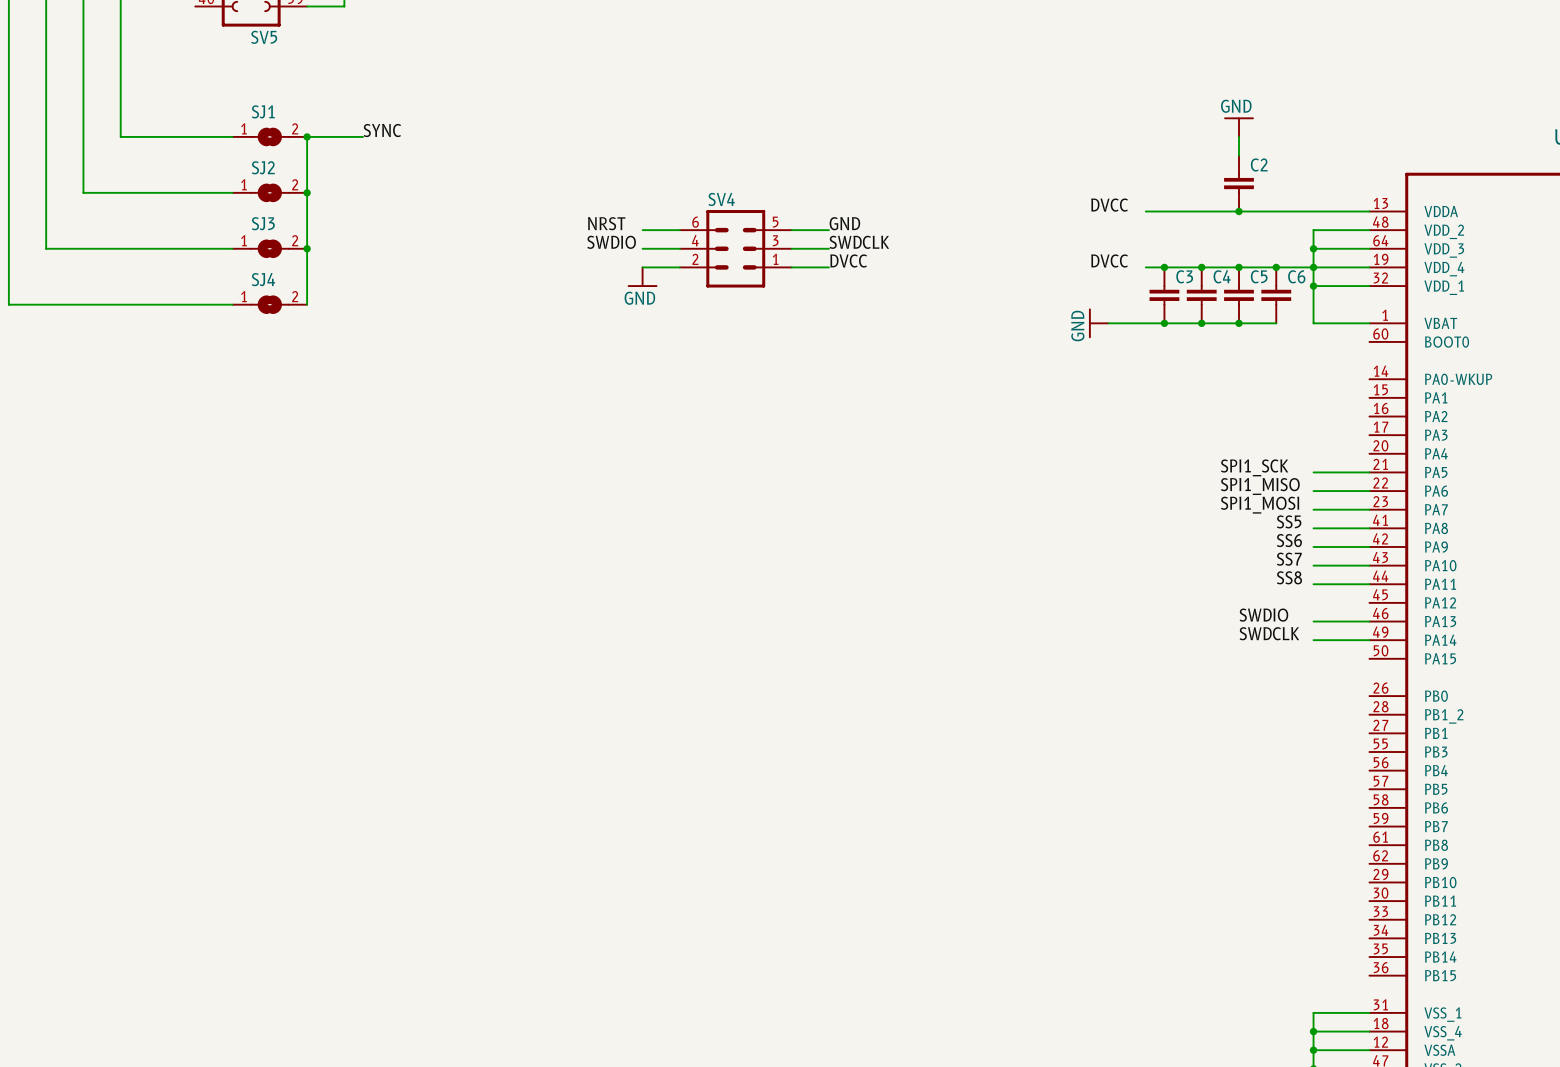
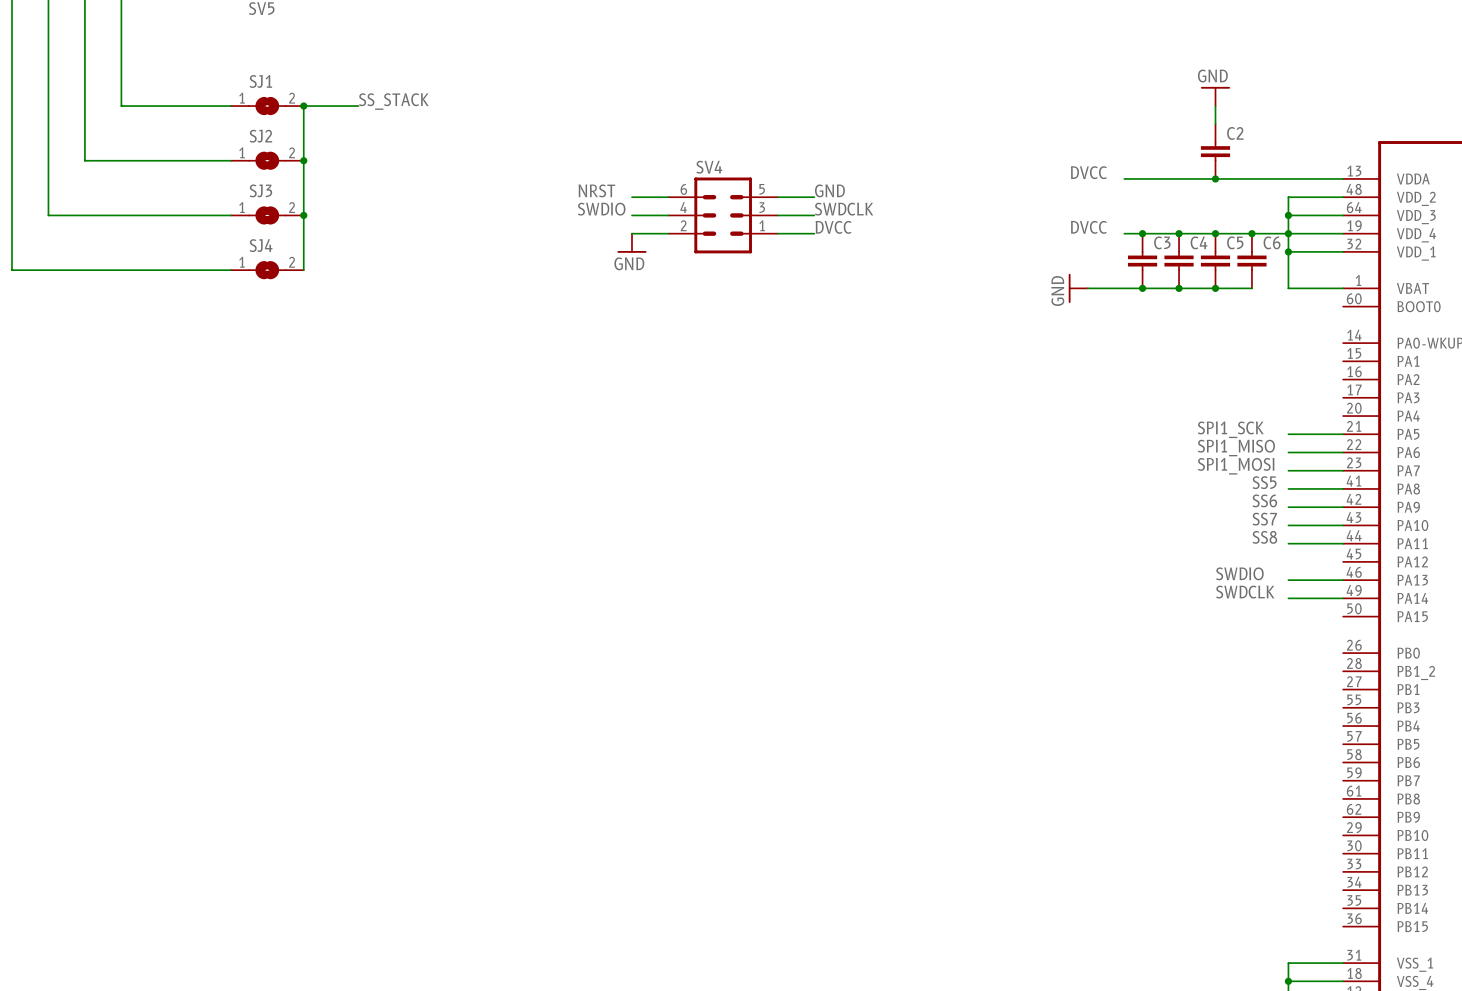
label: SYNC (382, 130) -> SS_STACK (393, 101)

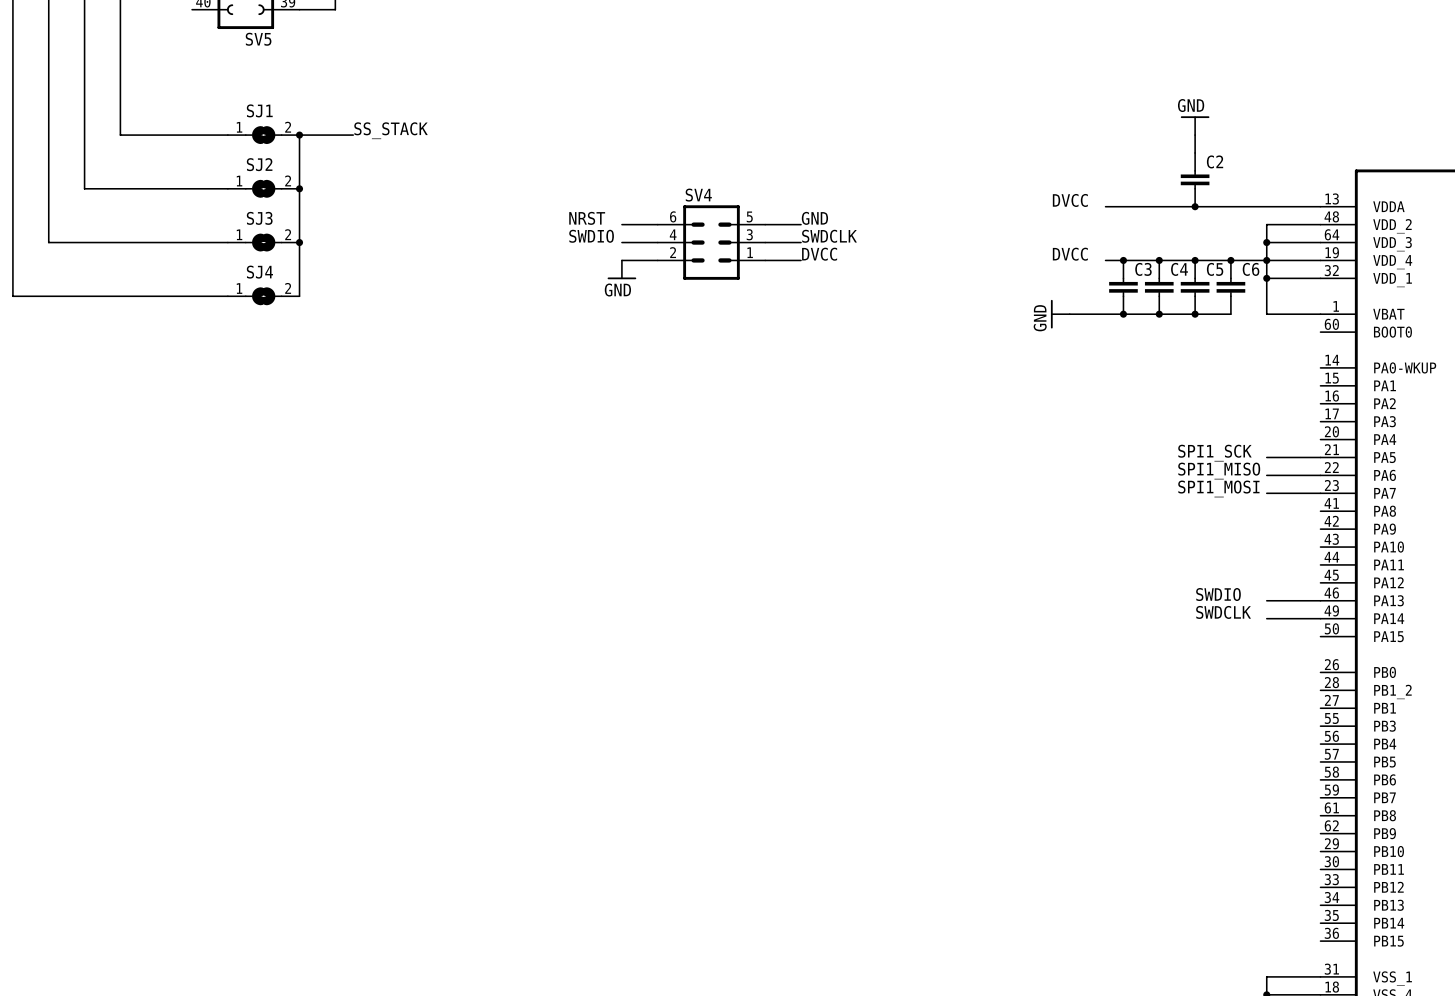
label: SS5 (1264, 482) -> none
wire: (1288, 488) (1343, 488) -> none
label: SS6 (1264, 500) -> none
wire: (1288, 507) (1343, 507) -> none
label: SS7 (1264, 519) -> none
wire: (1288, 525) (1343, 525) -> none
label: SS8 (1264, 537) -> none
wire: (1288, 543) (1343, 543) -> none

